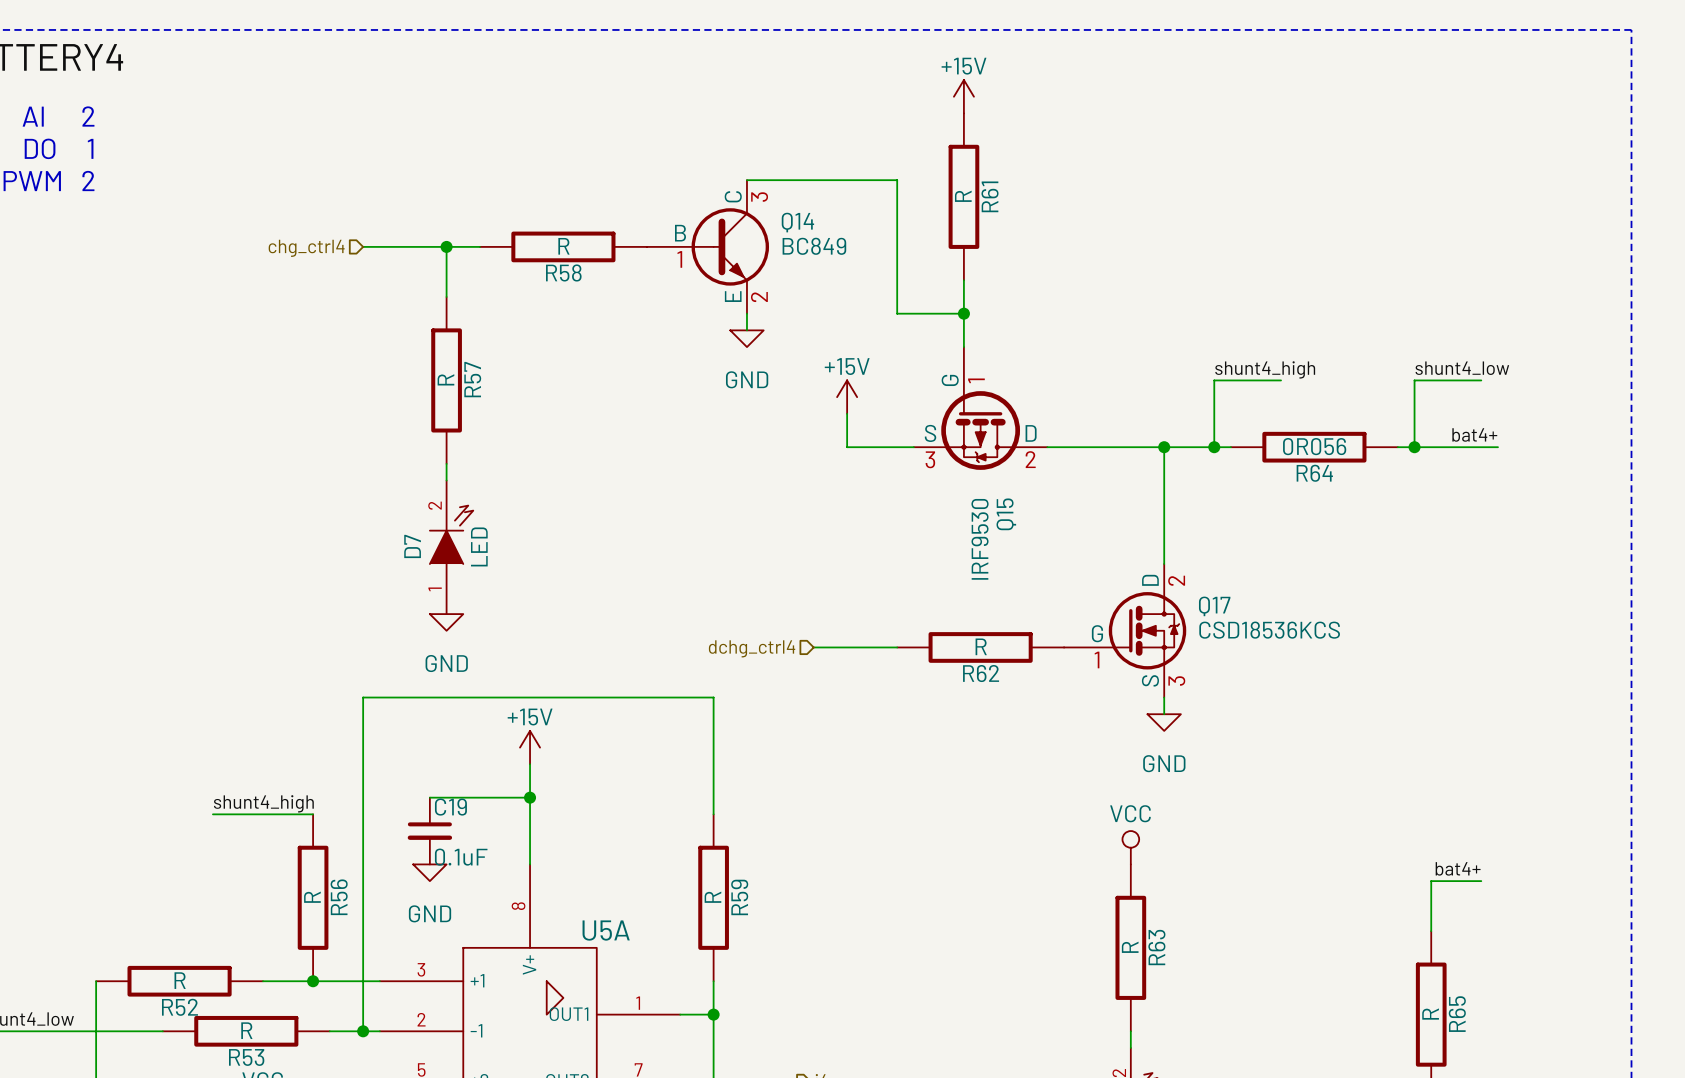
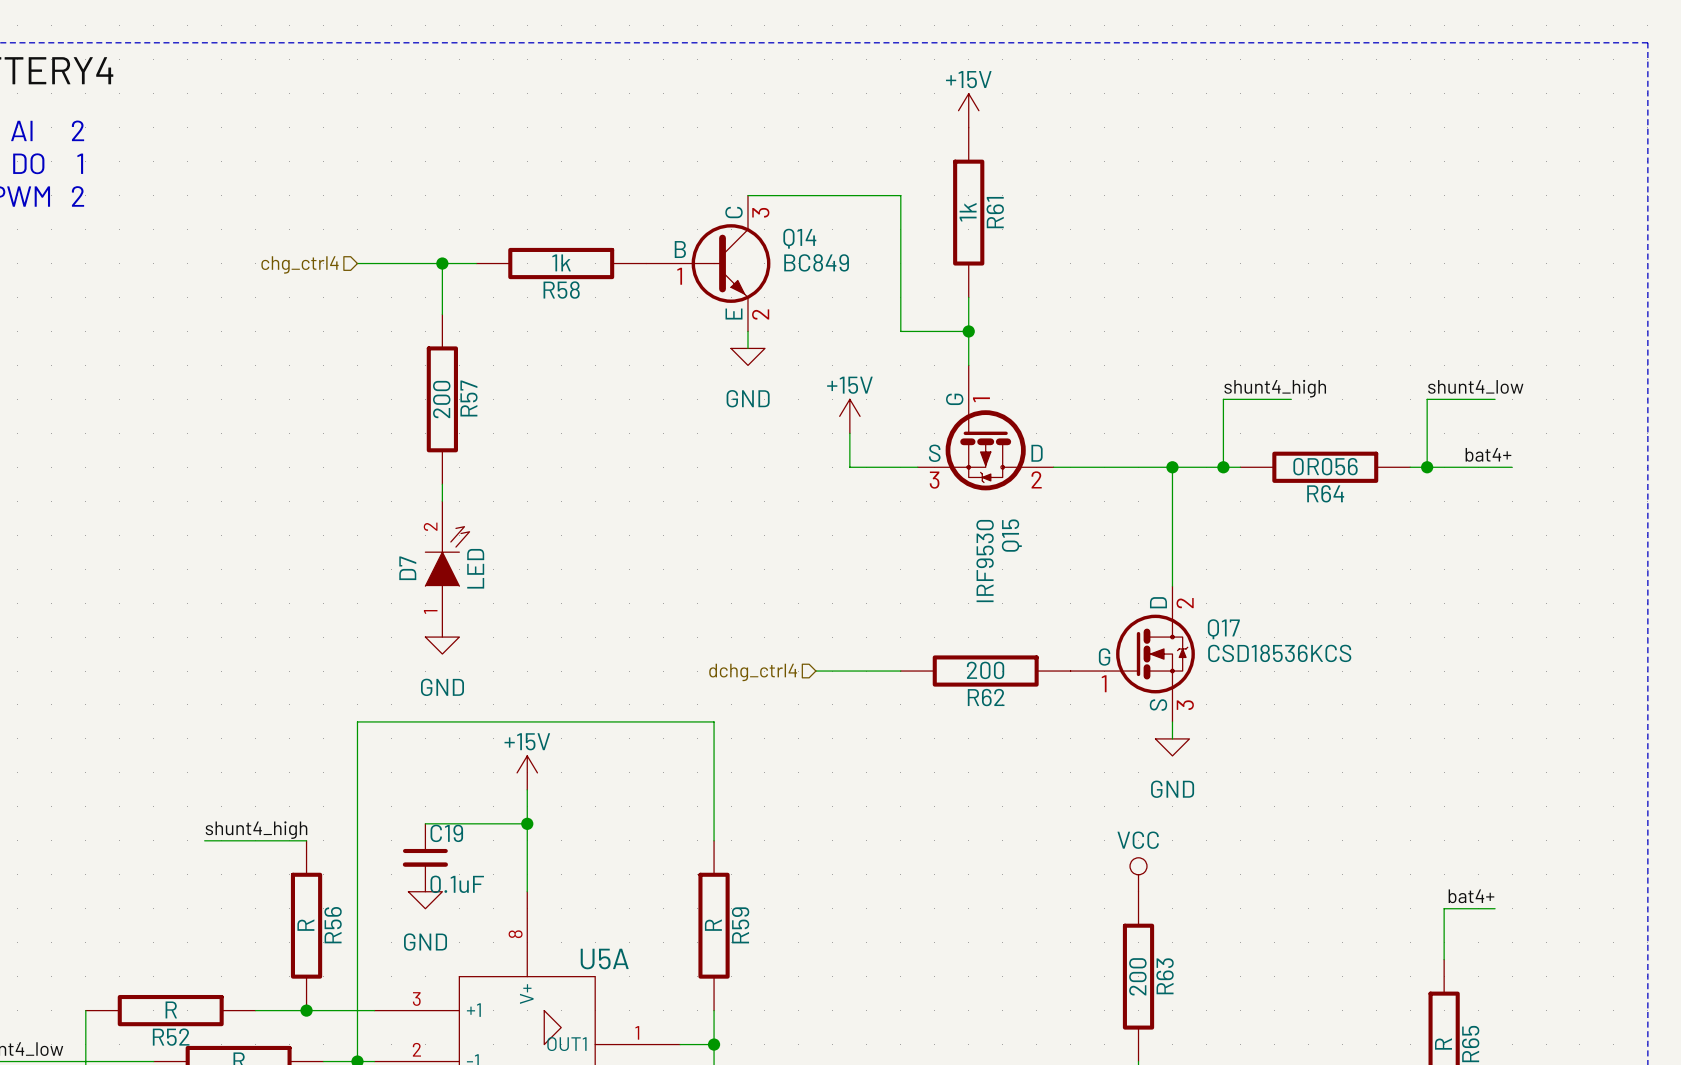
R61 value: R (963, 196) -> 1k (968, 212)
R58 value: R (563, 246) -> 1k (561, 262)
R57 value: R (445, 379) -> 200 (441, 399)
R62 value: R (981, 646) -> 200 (985, 670)
R63 value: R (1130, 947) -> 200 (1137, 976)

